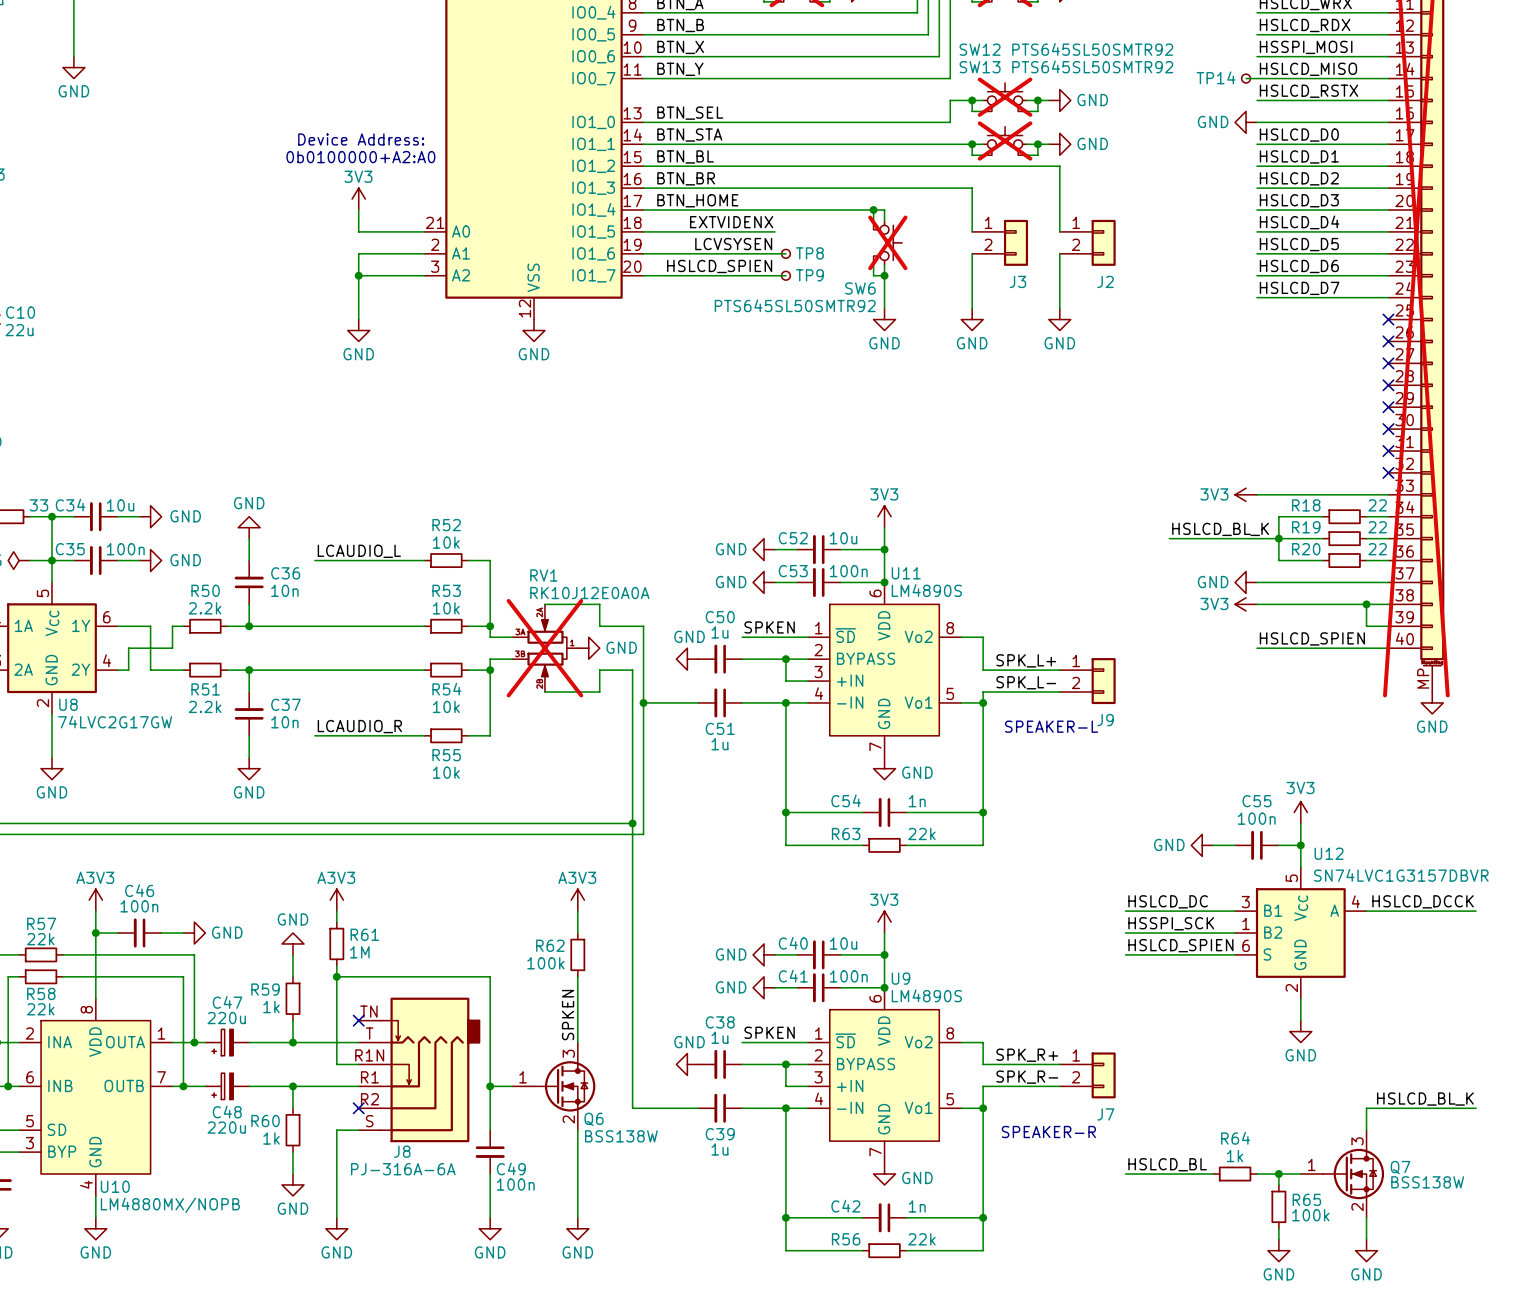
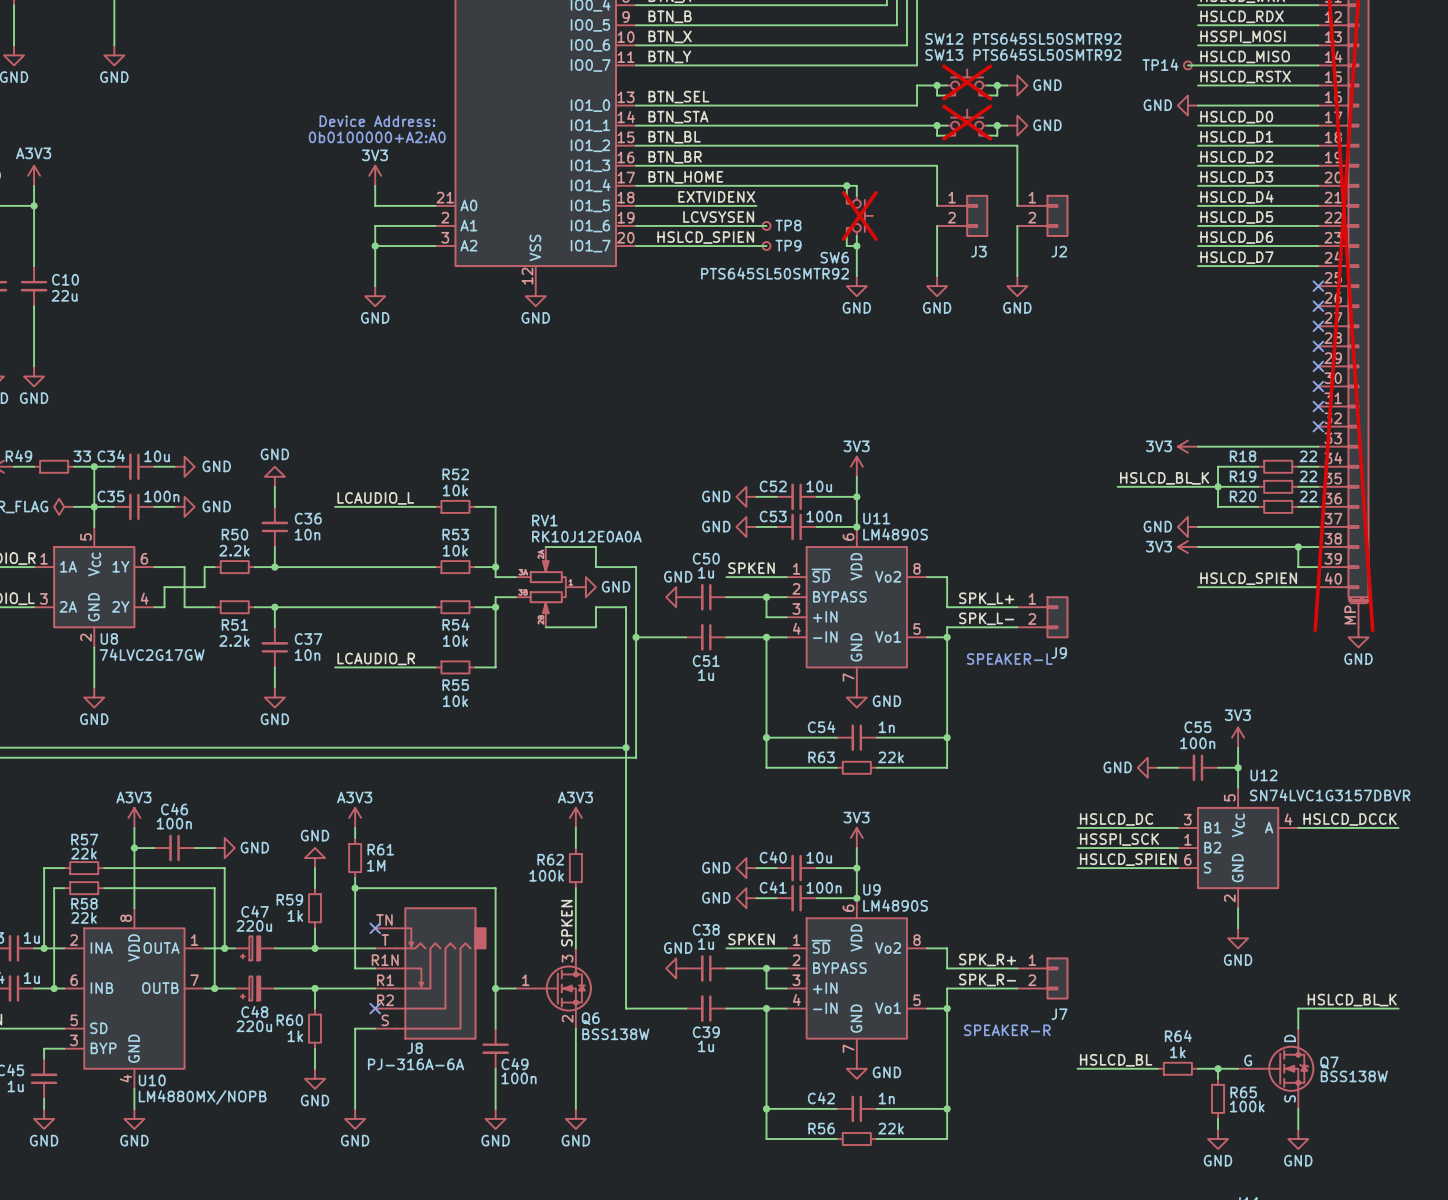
RV1 do-not-place cross: (544, 648) -> none
Q7 symbol: [1300, 1130, 1385, 1218] -> [1238, 1028, 1315, 1109]

